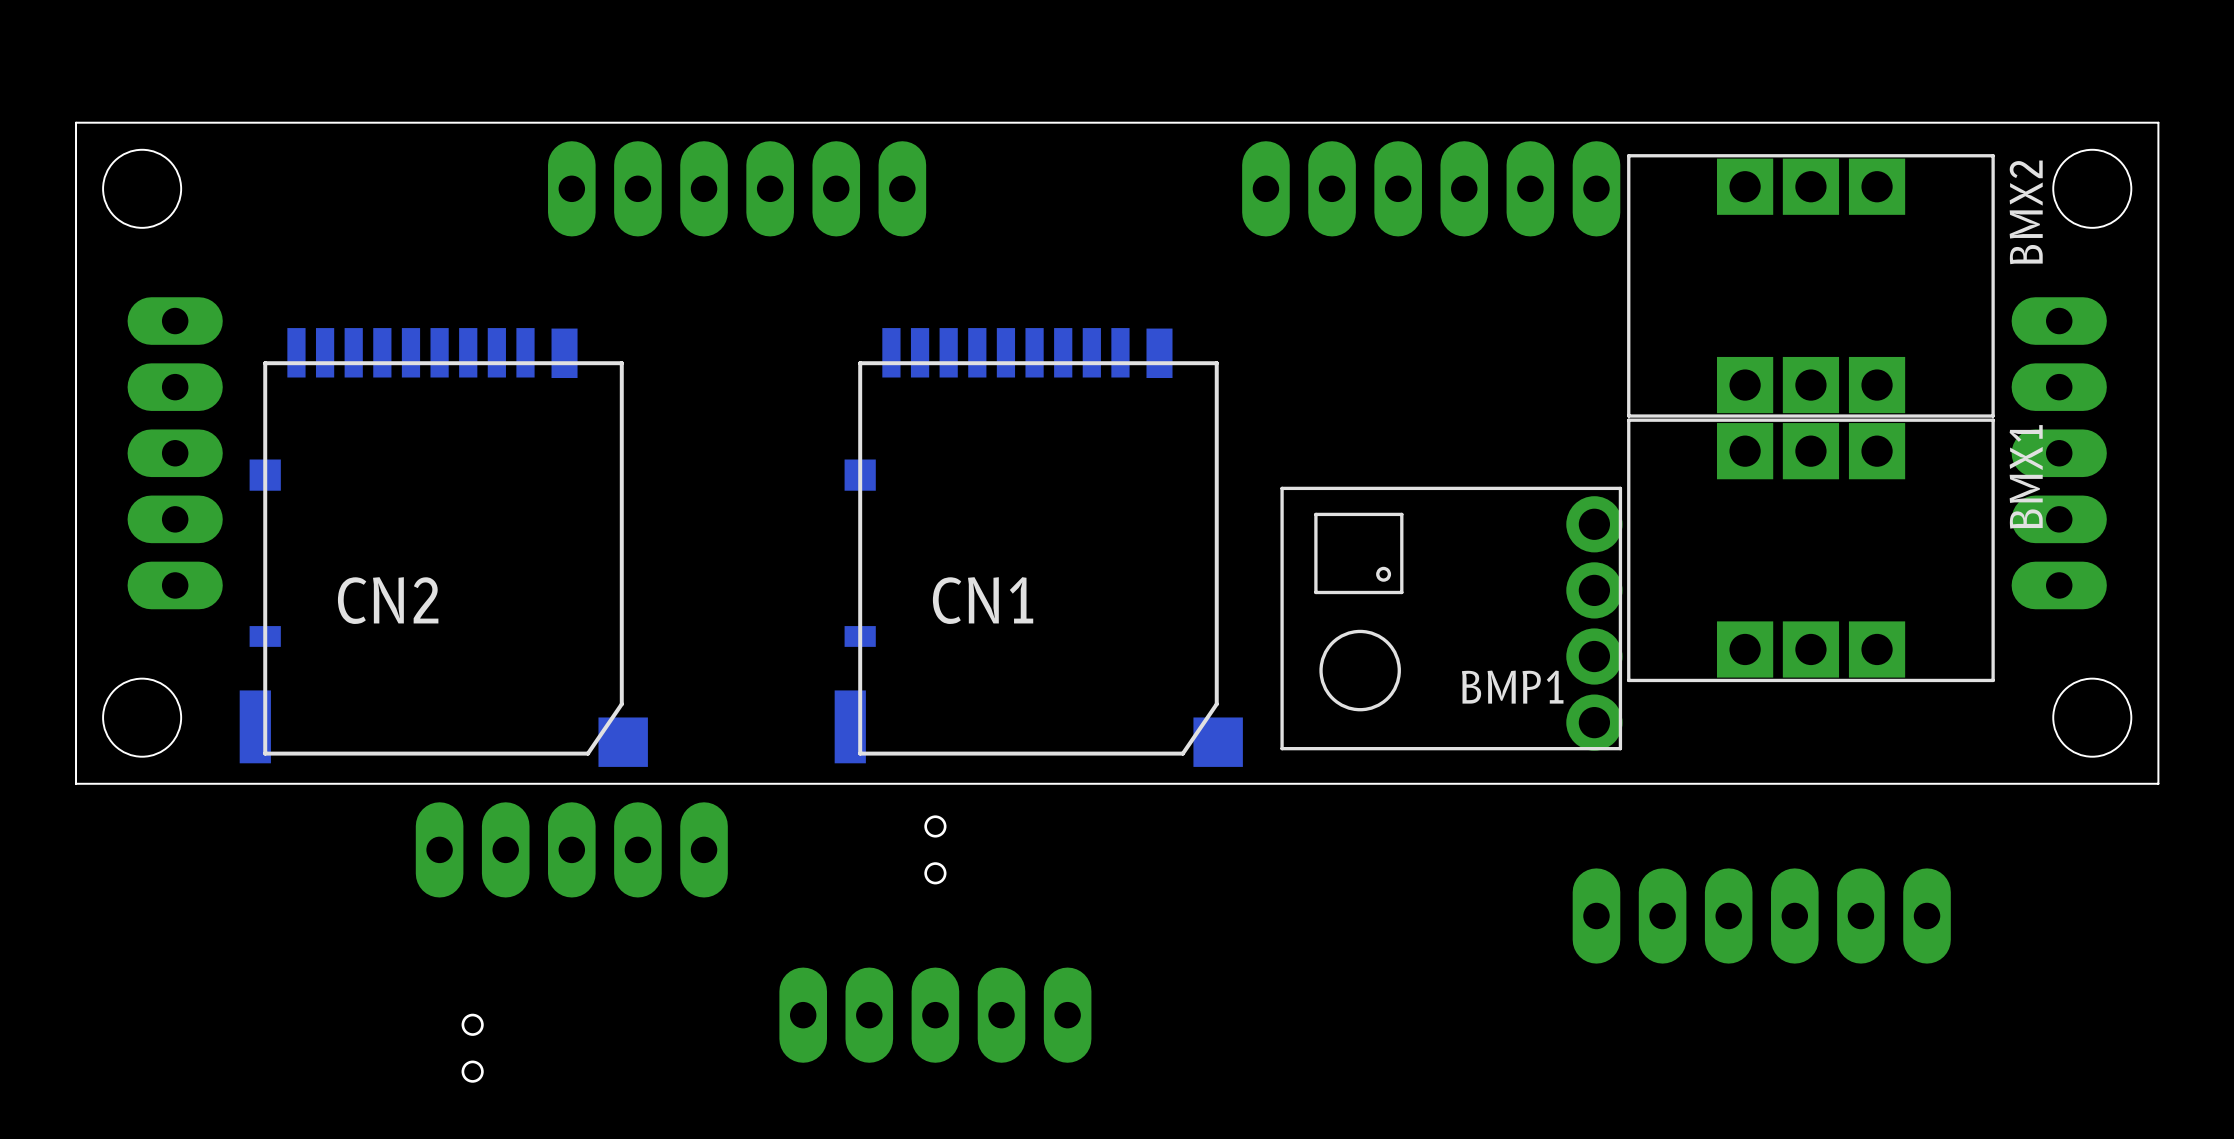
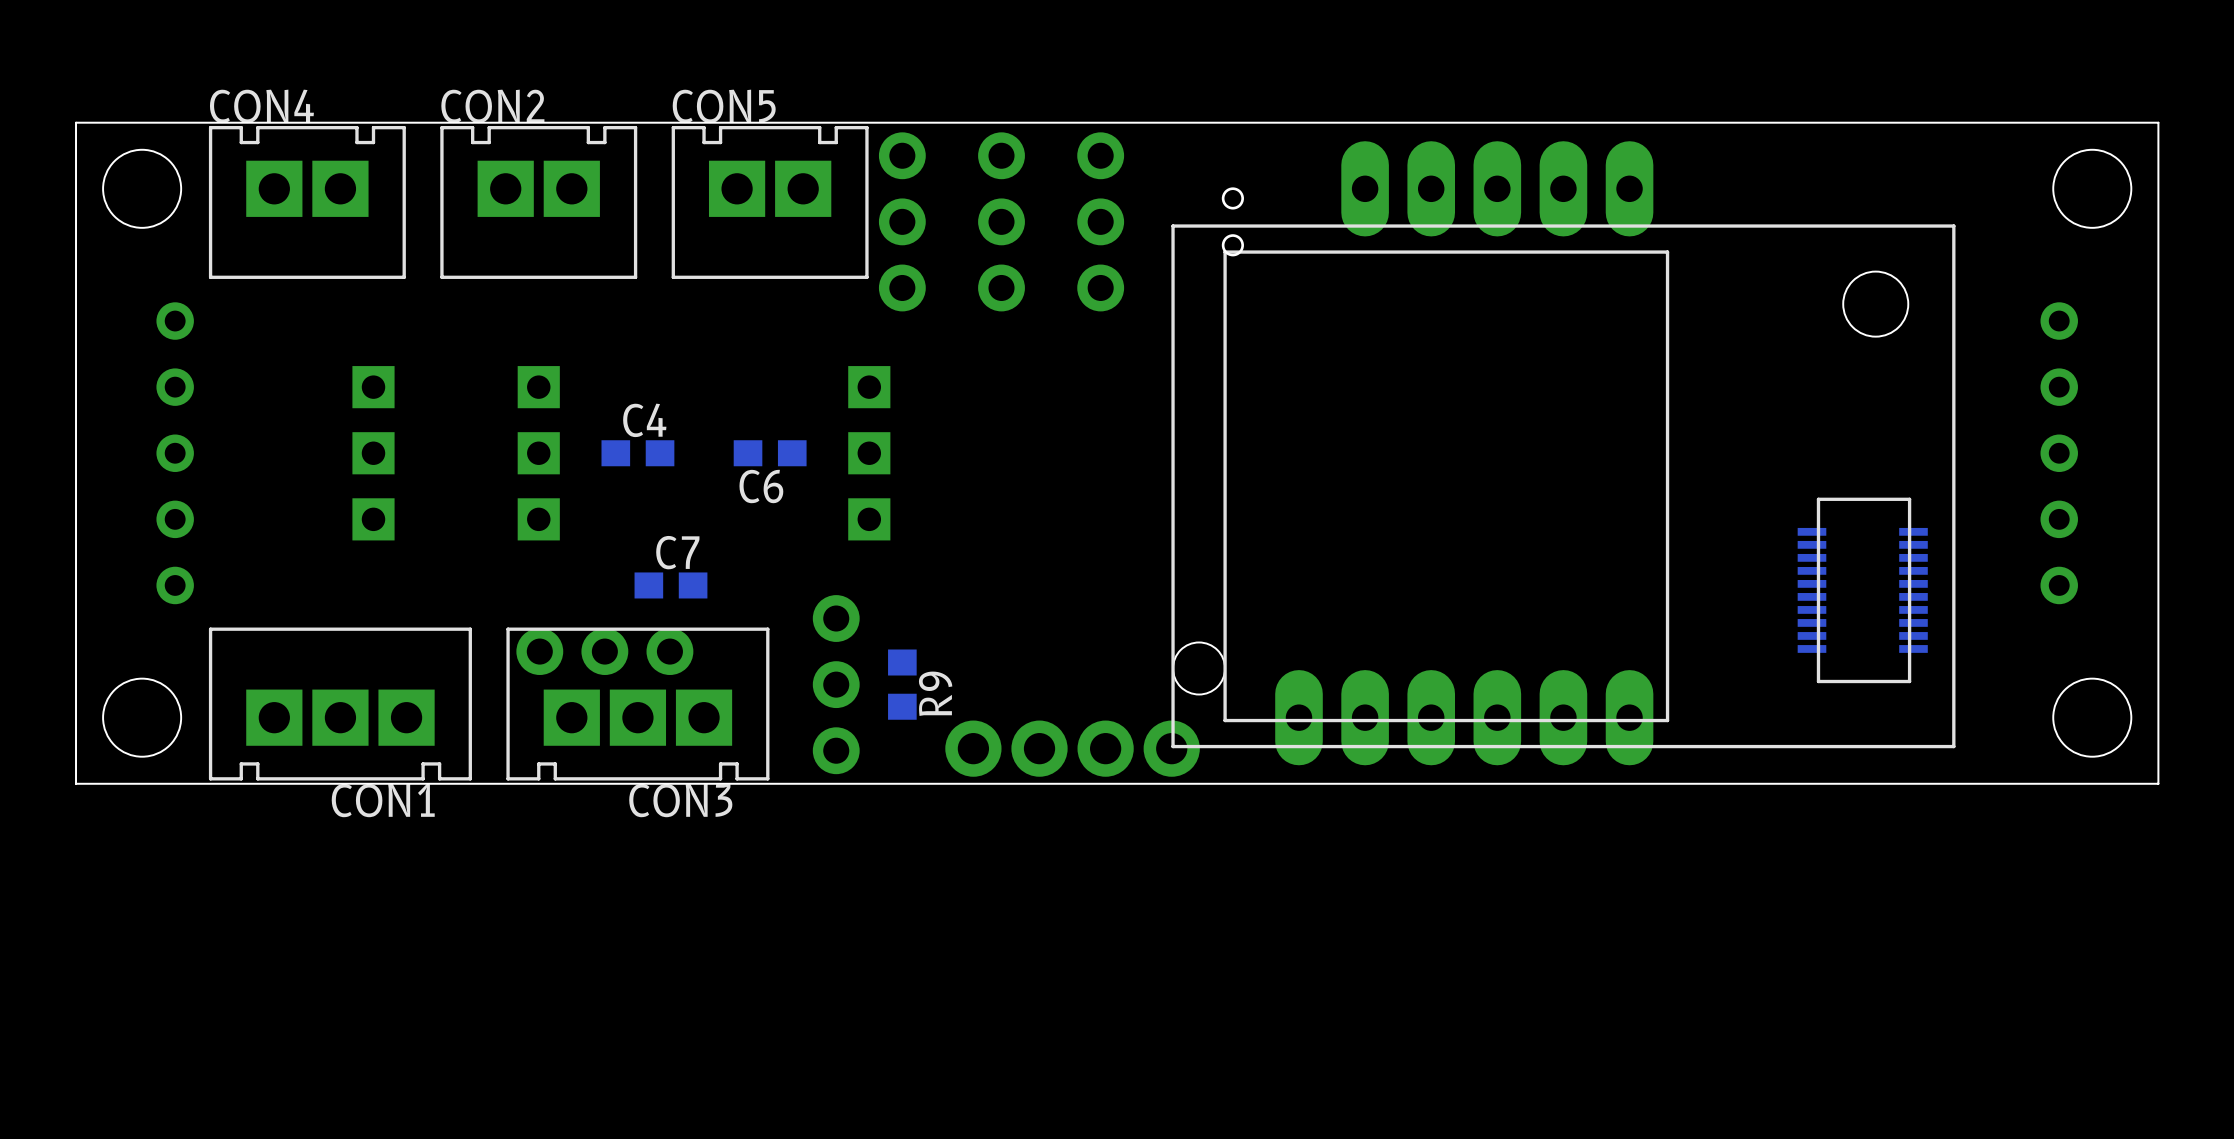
part: (737, 188) -> none
part: (1431, 188) -> none
part: none -> (1497, 188)
CON4: none -> (307, 202)
CON2: none -> (538, 202)
CON5: none -> (770, 202)
part: none -> (902, 221)
part: none -> (1001, 221)
part: none -> (1100, 221)
part: none -> (1232, 221)
BMX2: (1810, 285) -> none
part footprint: [127, 297, 223, 610] -> [156, 302, 194, 605]
part footprint: [2011, 297, 2107, 610] -> [2040, 302, 2078, 605]
part: none -> (373, 453)
part: none -> (538, 453)
C4: none -> (637, 453)
C6: none -> (770, 453)
part: none -> (869, 453)
part: none -> (1563, 486)
CN2: (443, 547) -> none
CN1: (1038, 547) -> none
BMX1: (1810, 550) -> none
C7: none -> (670, 585)
BMP1 side: bottom (1451, 618) -> top (1072, 748)
part: none -> (604, 651)
part: none -> (836, 684)
R9: none -> (902, 684)
CON1: none -> (340, 704)
CON3: none -> (637, 704)
part: none -> (1464, 717)
part: (571, 849) -> none
part: (935, 849) -> none
part: (1761, 916) -> none
part: (935, 1015) -> none
part: (472, 1048) -> none

